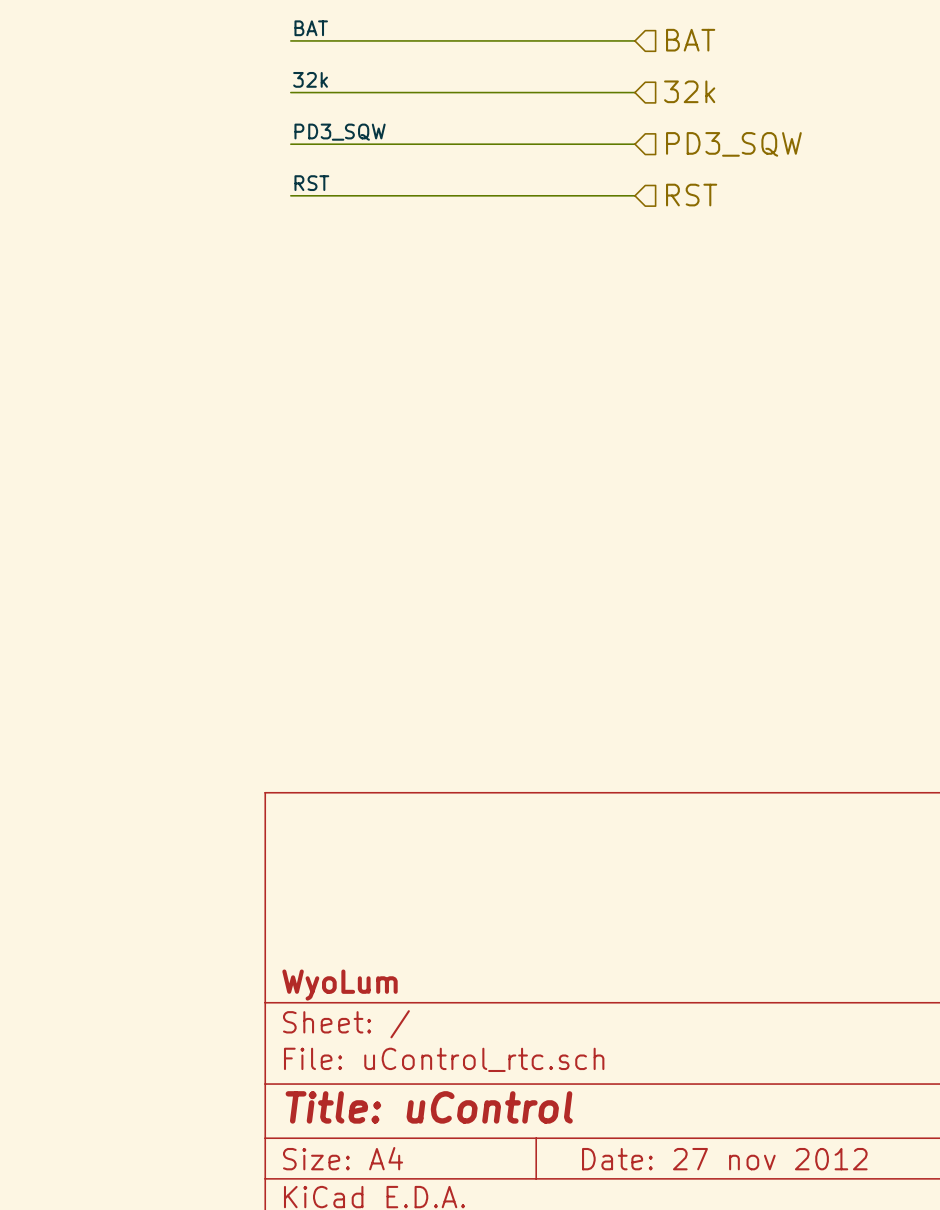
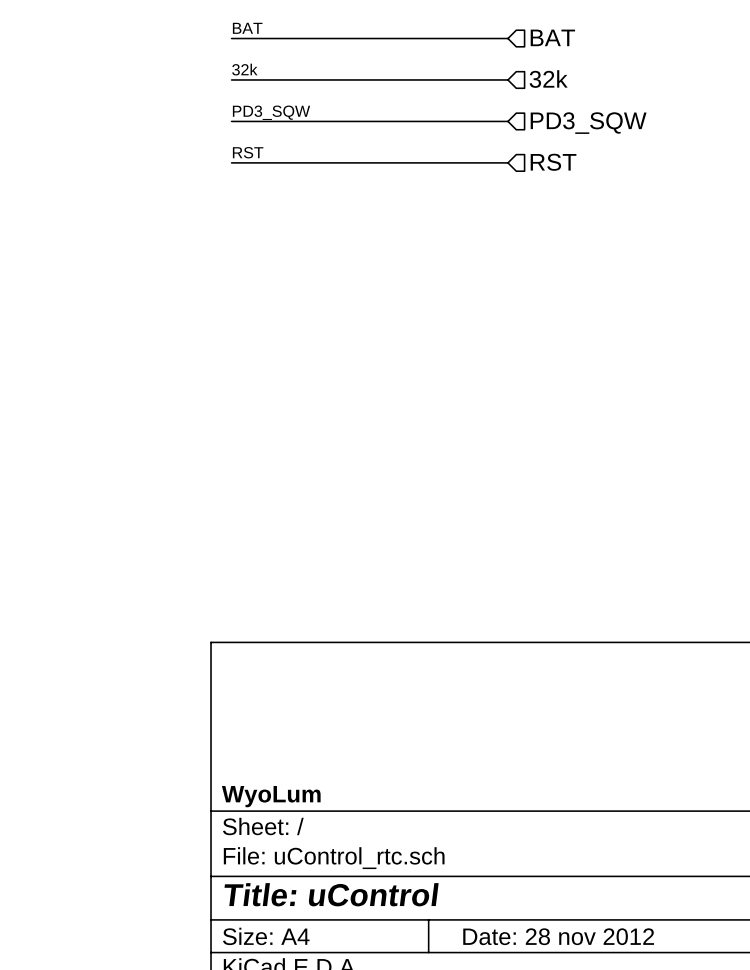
title block: Date: 27 nov 2012 (724, 1159) -> Date: 28 nov 2012 (558, 936)

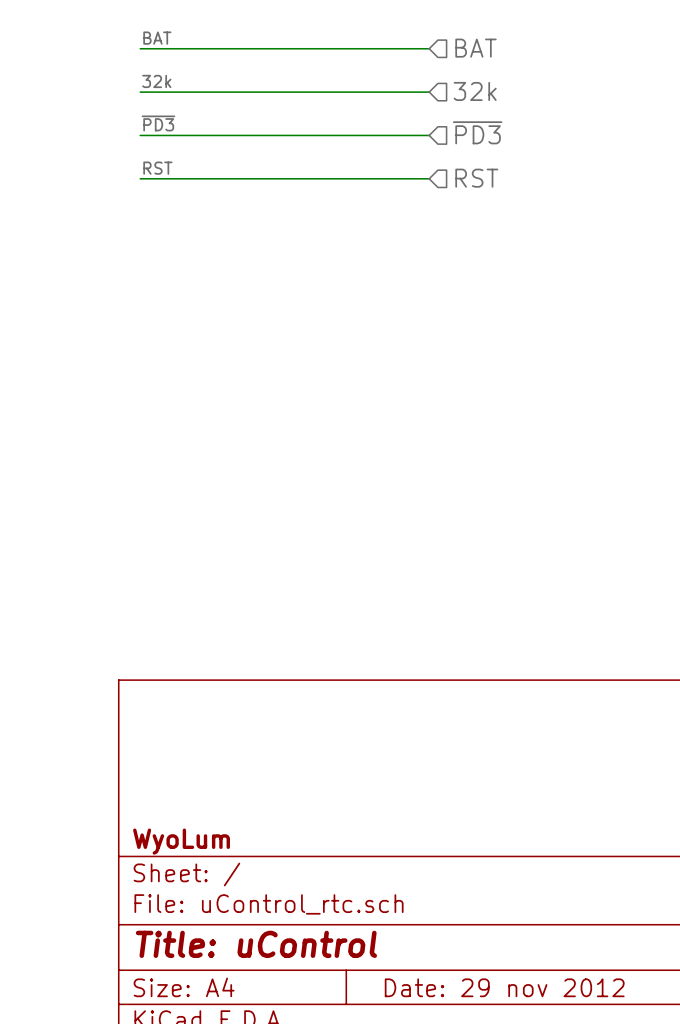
label: PD3_SQW (271, 112) -> ~{PD3} (158, 123)
hierarchical label: PD3_SQW (588, 123) -> ~{PD3} (477, 132)
title block: Date: 28 nov 2012 (558, 936) -> Date: 29 nov 2012 (504, 987)

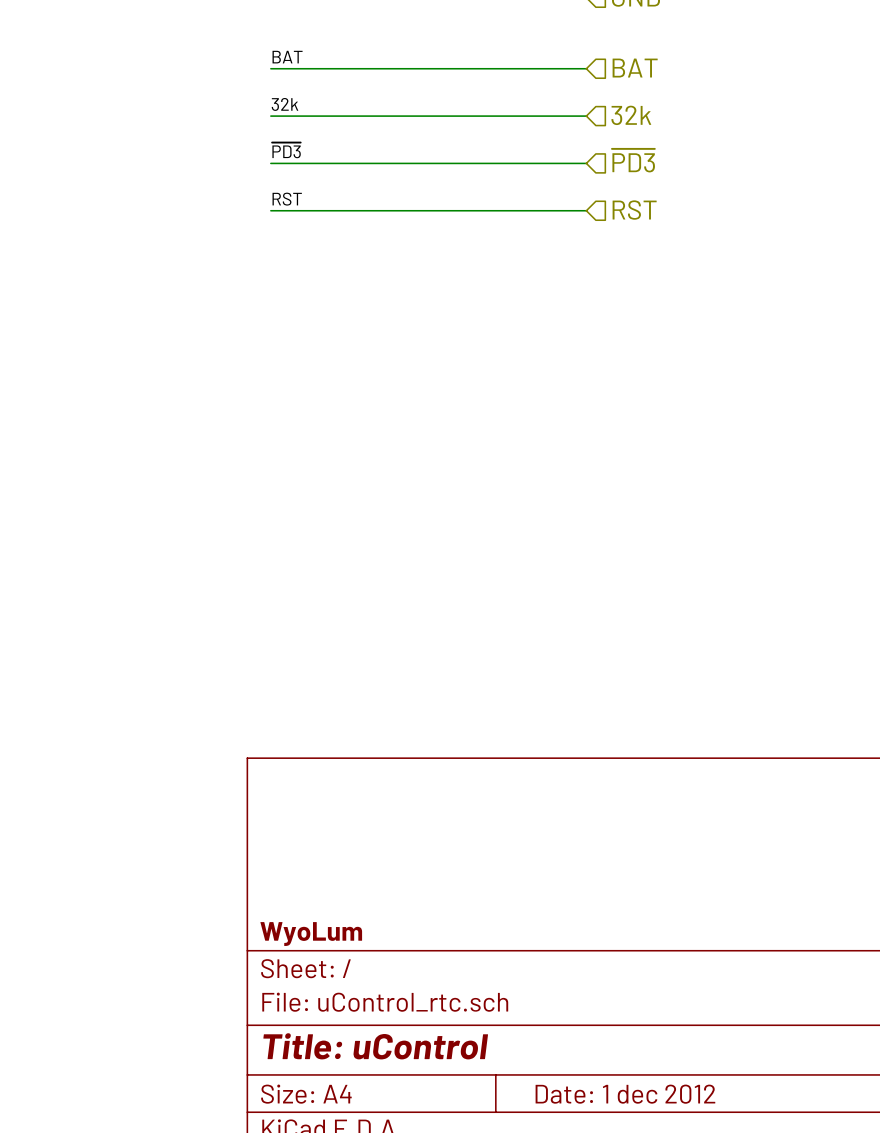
title block: Date: 29 nov 2012 (504, 987) -> Date: 1 dec 2012 (625, 1094)

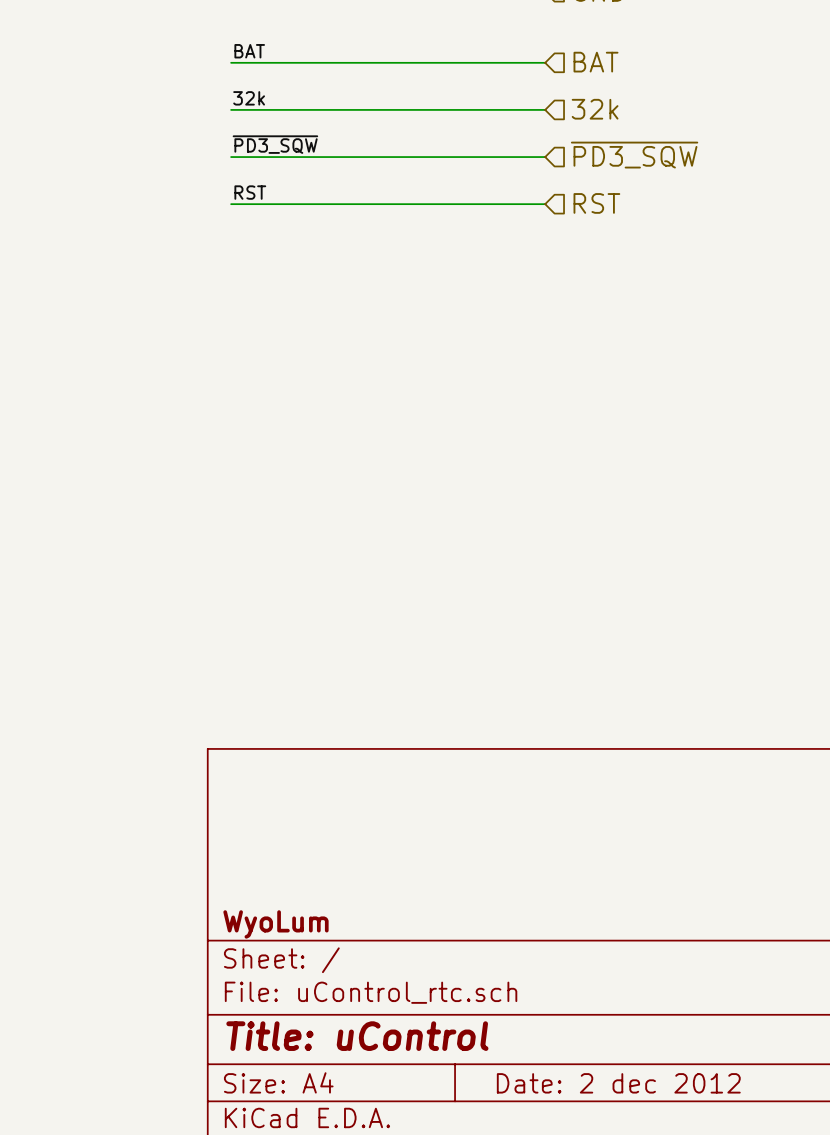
label: ~{PD3} (286, 150) -> ~{PD3_SQW} (275, 144)
hierarchical label: ~{PD3} (633, 160) -> ~{PD3_SQW} (634, 155)
title block: Date: 1 dec 2012 (625, 1094) -> Date: 2 dec 2012 (618, 1083)

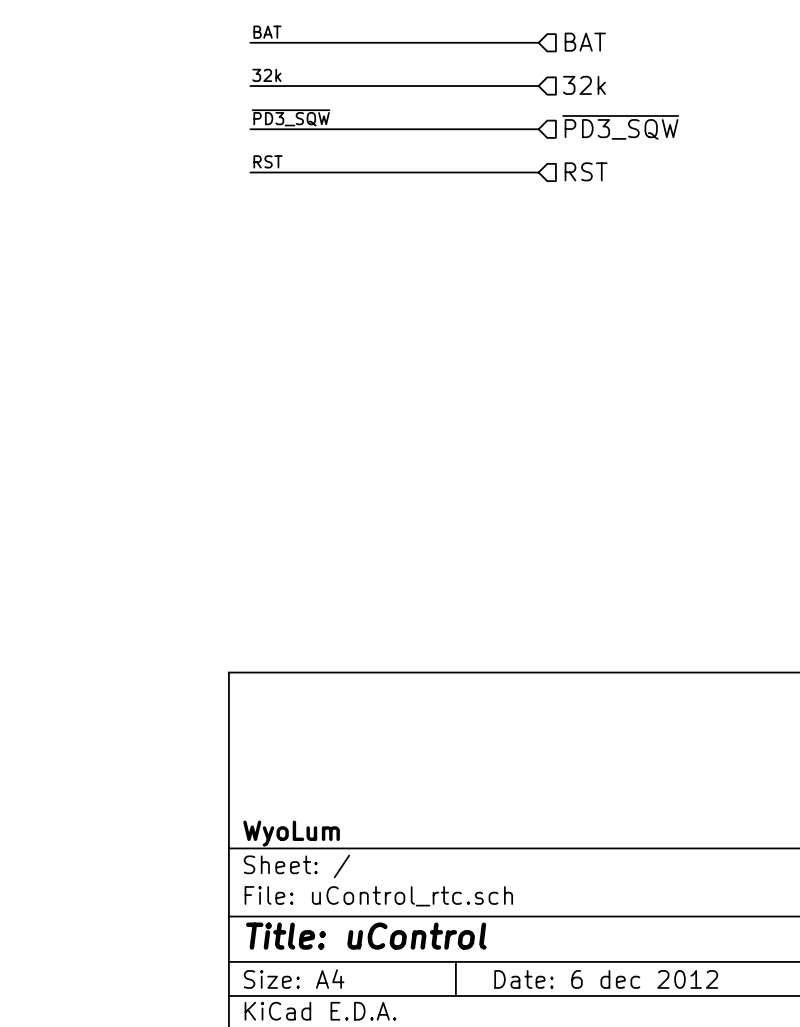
title block: Date: 2 dec 2012 (618, 1083) -> Date: 6 dec 2012 (606, 979)

